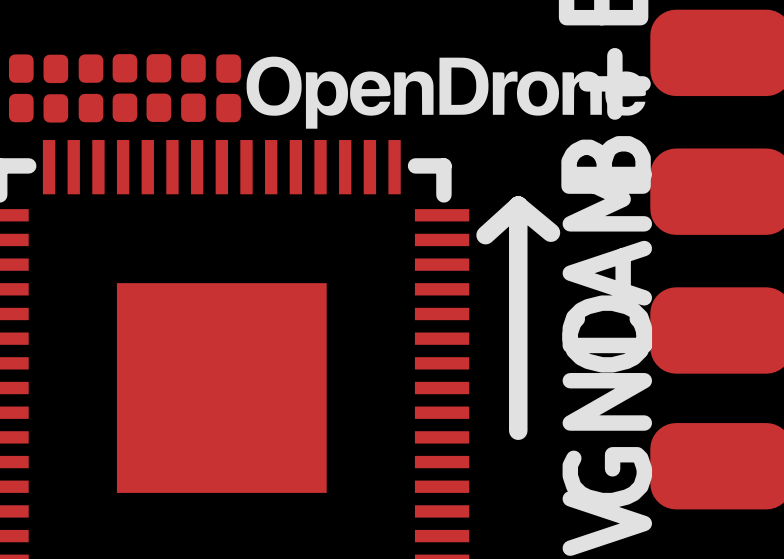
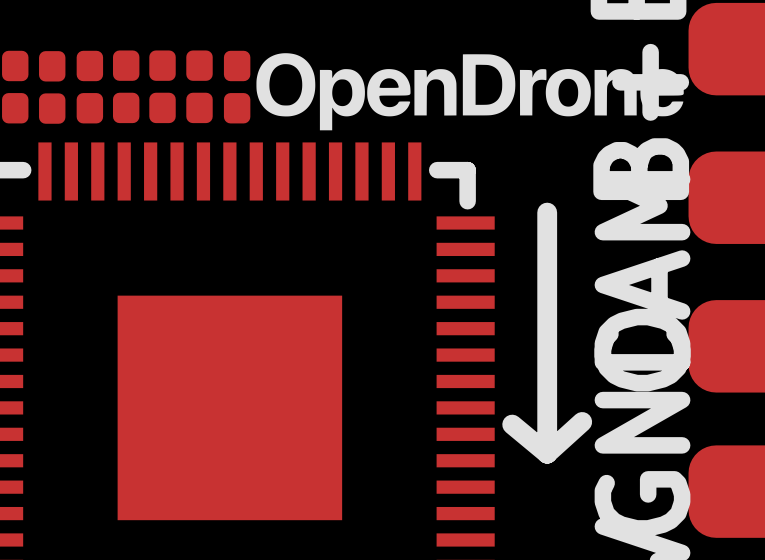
line: (550, 232) (518, 205) (485, 235) -> none
line: none -> (582, 421) (547, 453) (512, 424)

